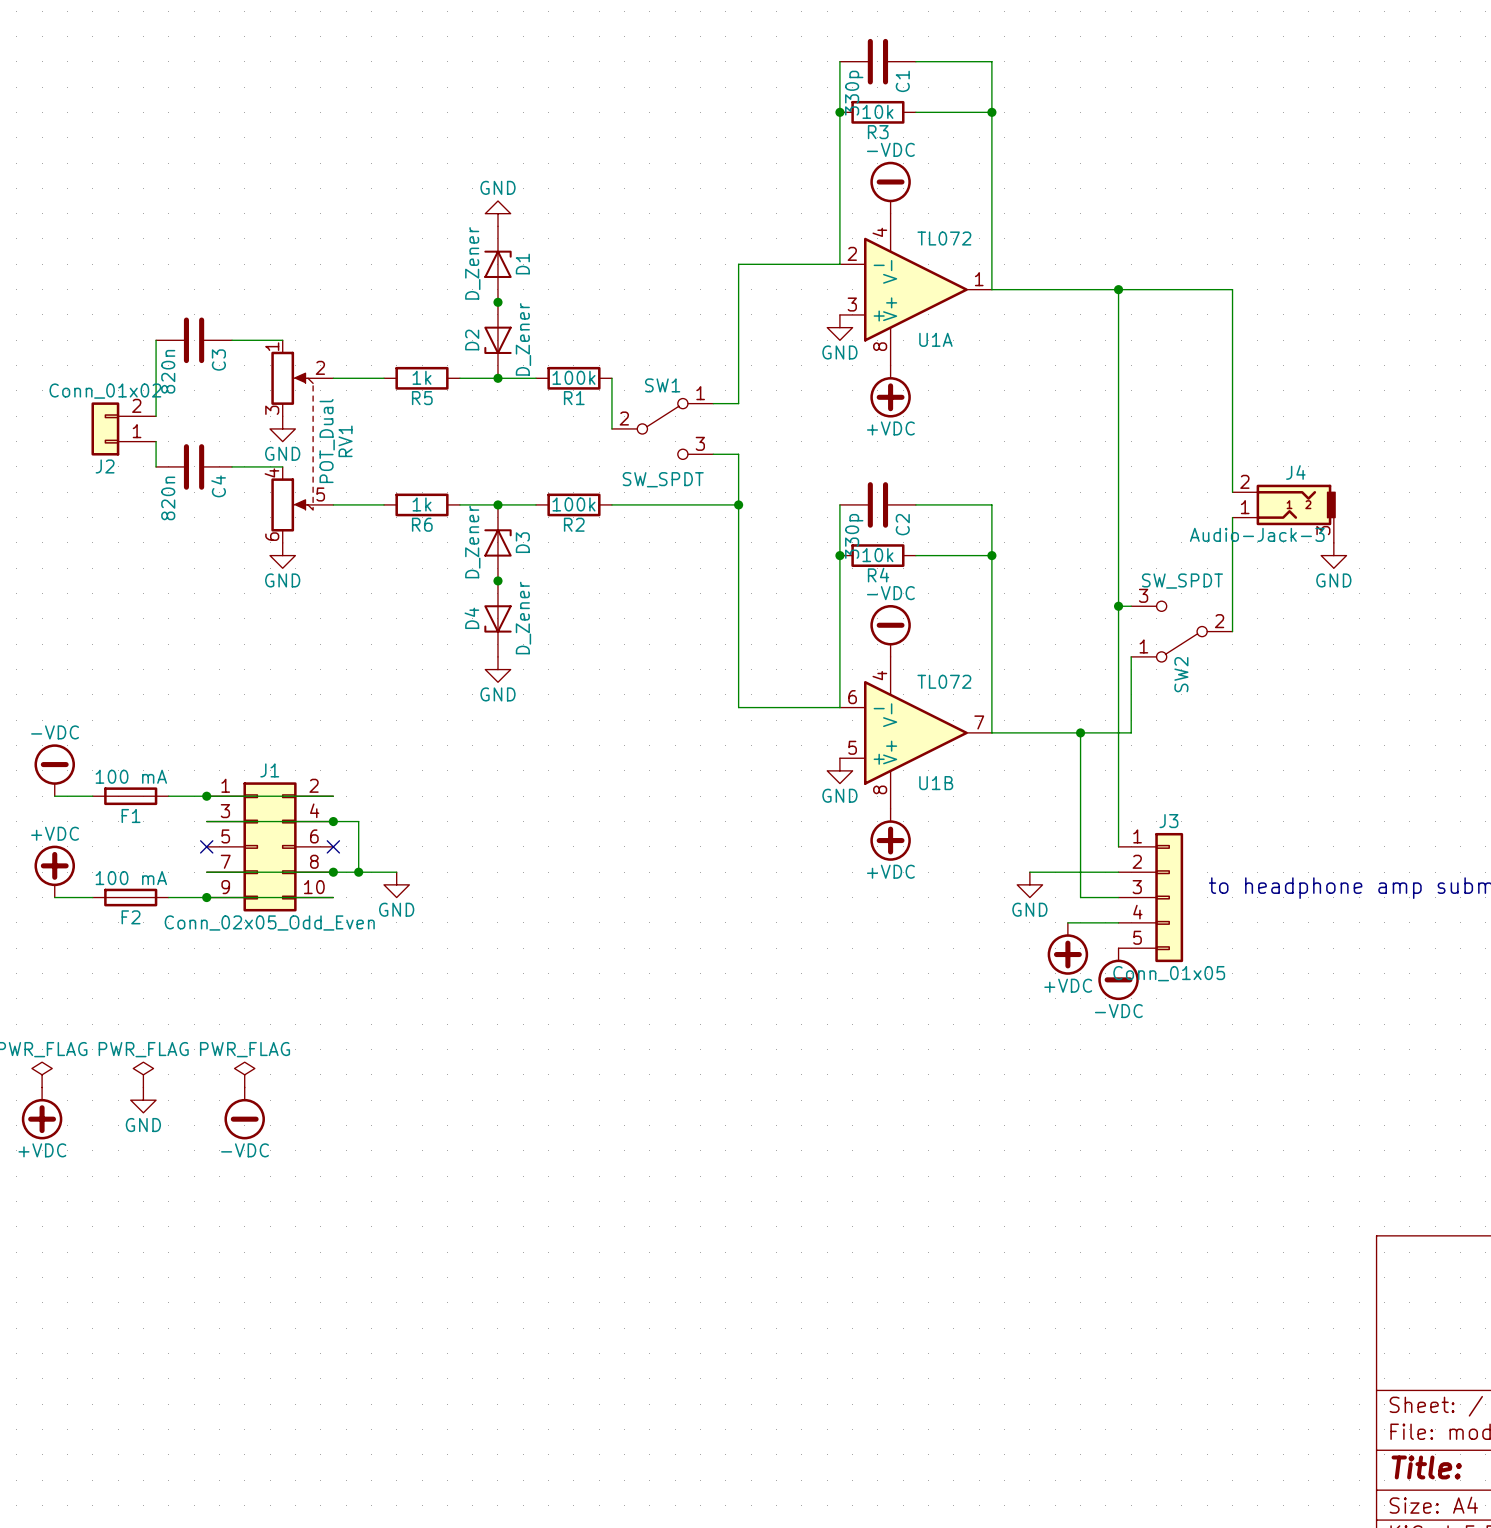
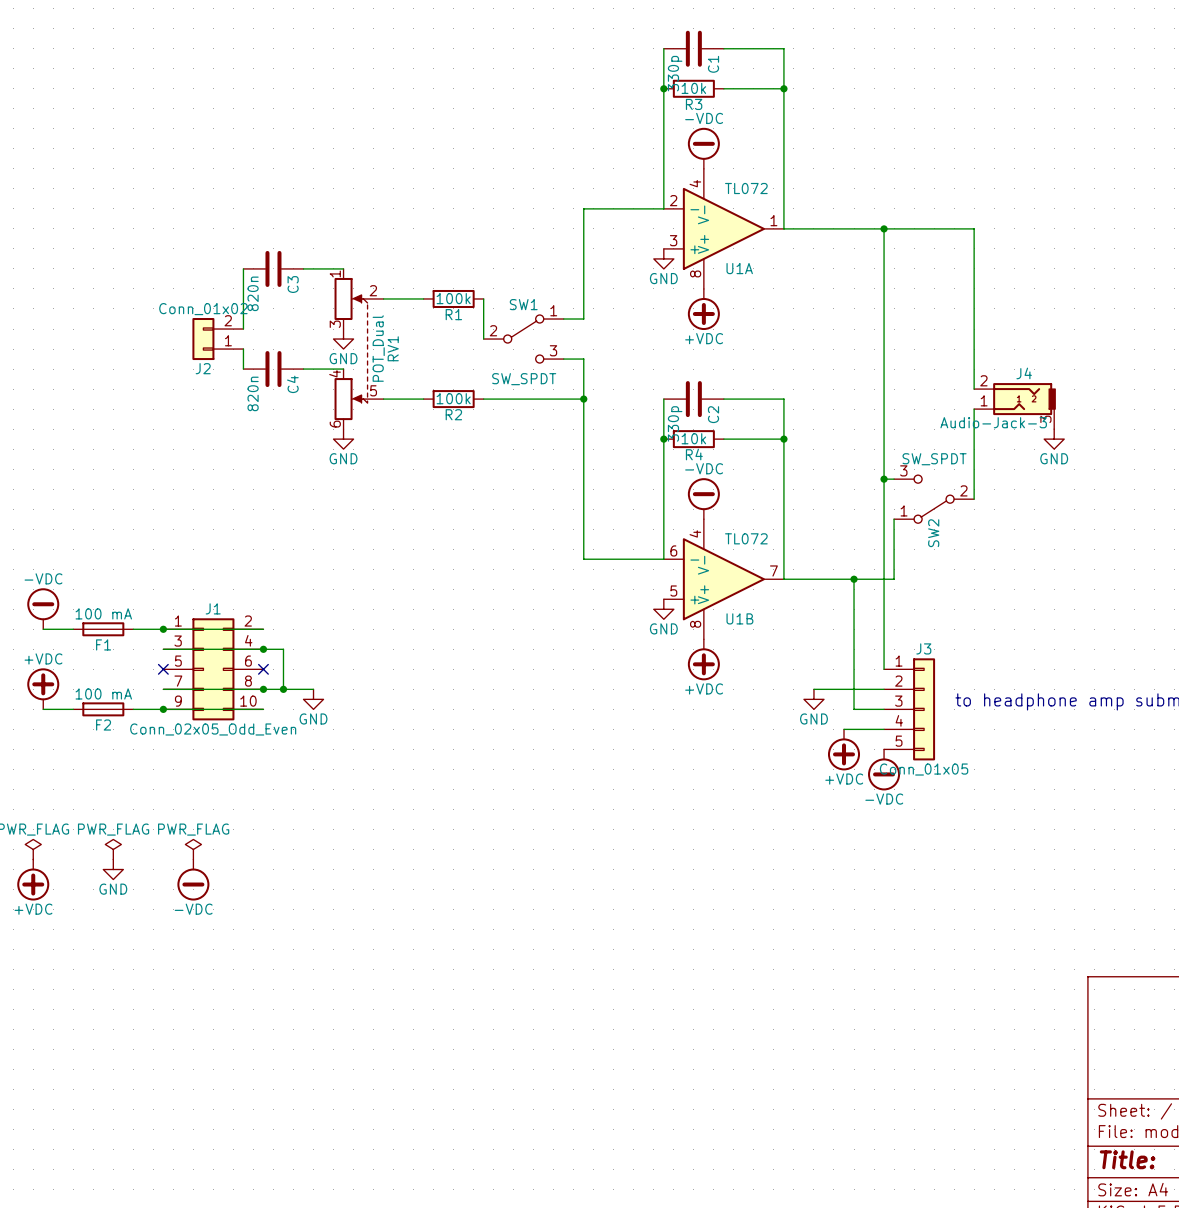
power symbol: GND (497, 213) -> none
D1: D_Zener (497, 264) -> none
junction: (497, 302) -> none
wire: (156, 340) (156, 416) -> (243, 268) (243, 329)
C3 position: (194, 340) -> (273, 268)
wire: (232, 340) (282, 340) -> (303, 268) (343, 268)
D2: D_Zener (497, 340) -> none
wire: (333, 378) (384, 378) -> none
R5: 1k (422, 378) -> none
junction: (497, 378) -> none
J2 position: (123, 428) -> (217, 339)
power symbol: GND (282, 428) -> none
power symbol: none -> GND (343, 339)
wire: (156, 441) (156, 466) -> (243, 349) (243, 369)
RV1 position: (302, 441) -> (359, 349)
C4 position: (194, 466) -> (273, 369)
wire: (232, 466) (282, 466) -> (303, 369) (343, 369)
wire: (333, 504) (384, 504) -> none
R6: 1k (422, 504) -> none
junction: (497, 504) -> none
D3: D_Zener (497, 542) -> none
power symbol: GND (282, 555) -> none
power symbol: none -> GND (343, 439)
junction: (497, 580) -> none
D4: D_Zener (497, 618) -> none
power symbol: GND (497, 669) -> none

